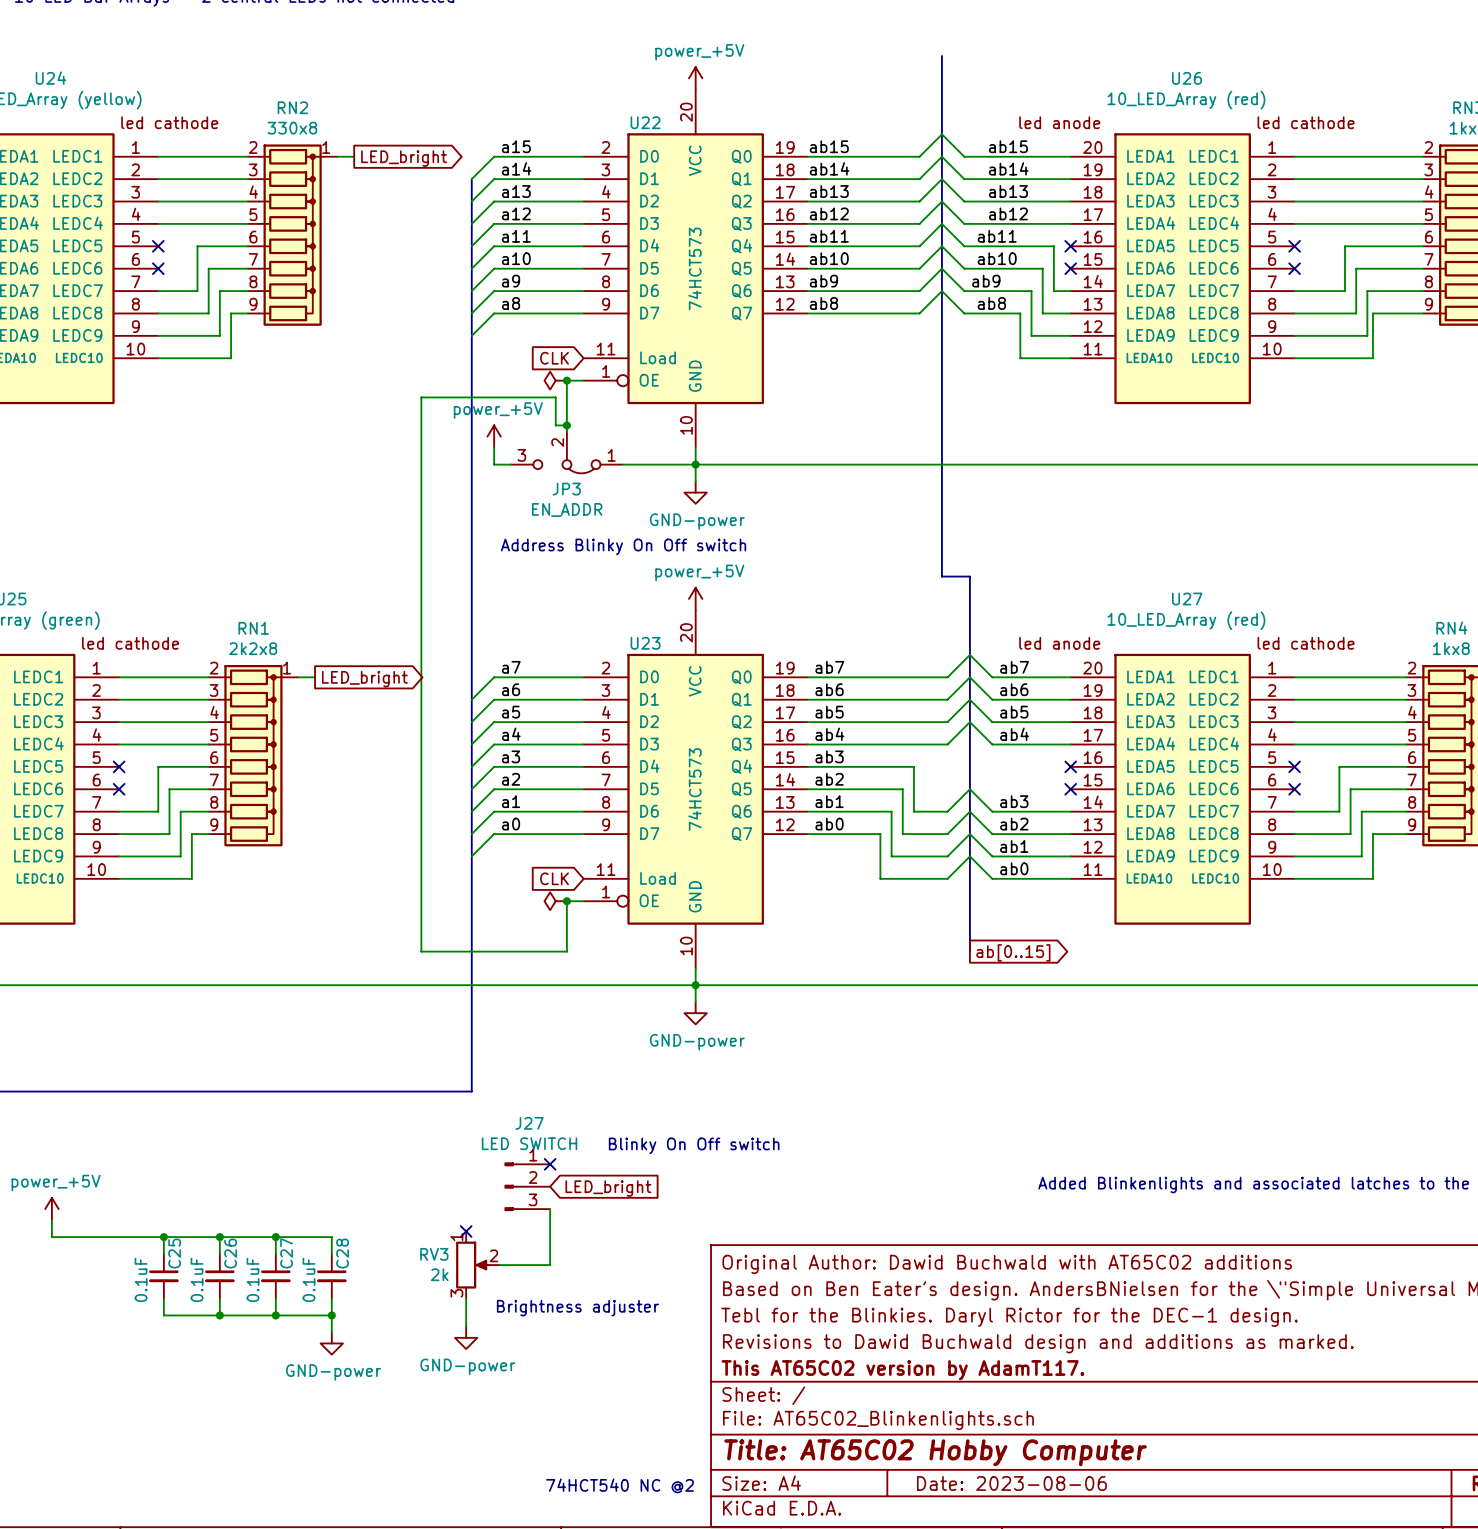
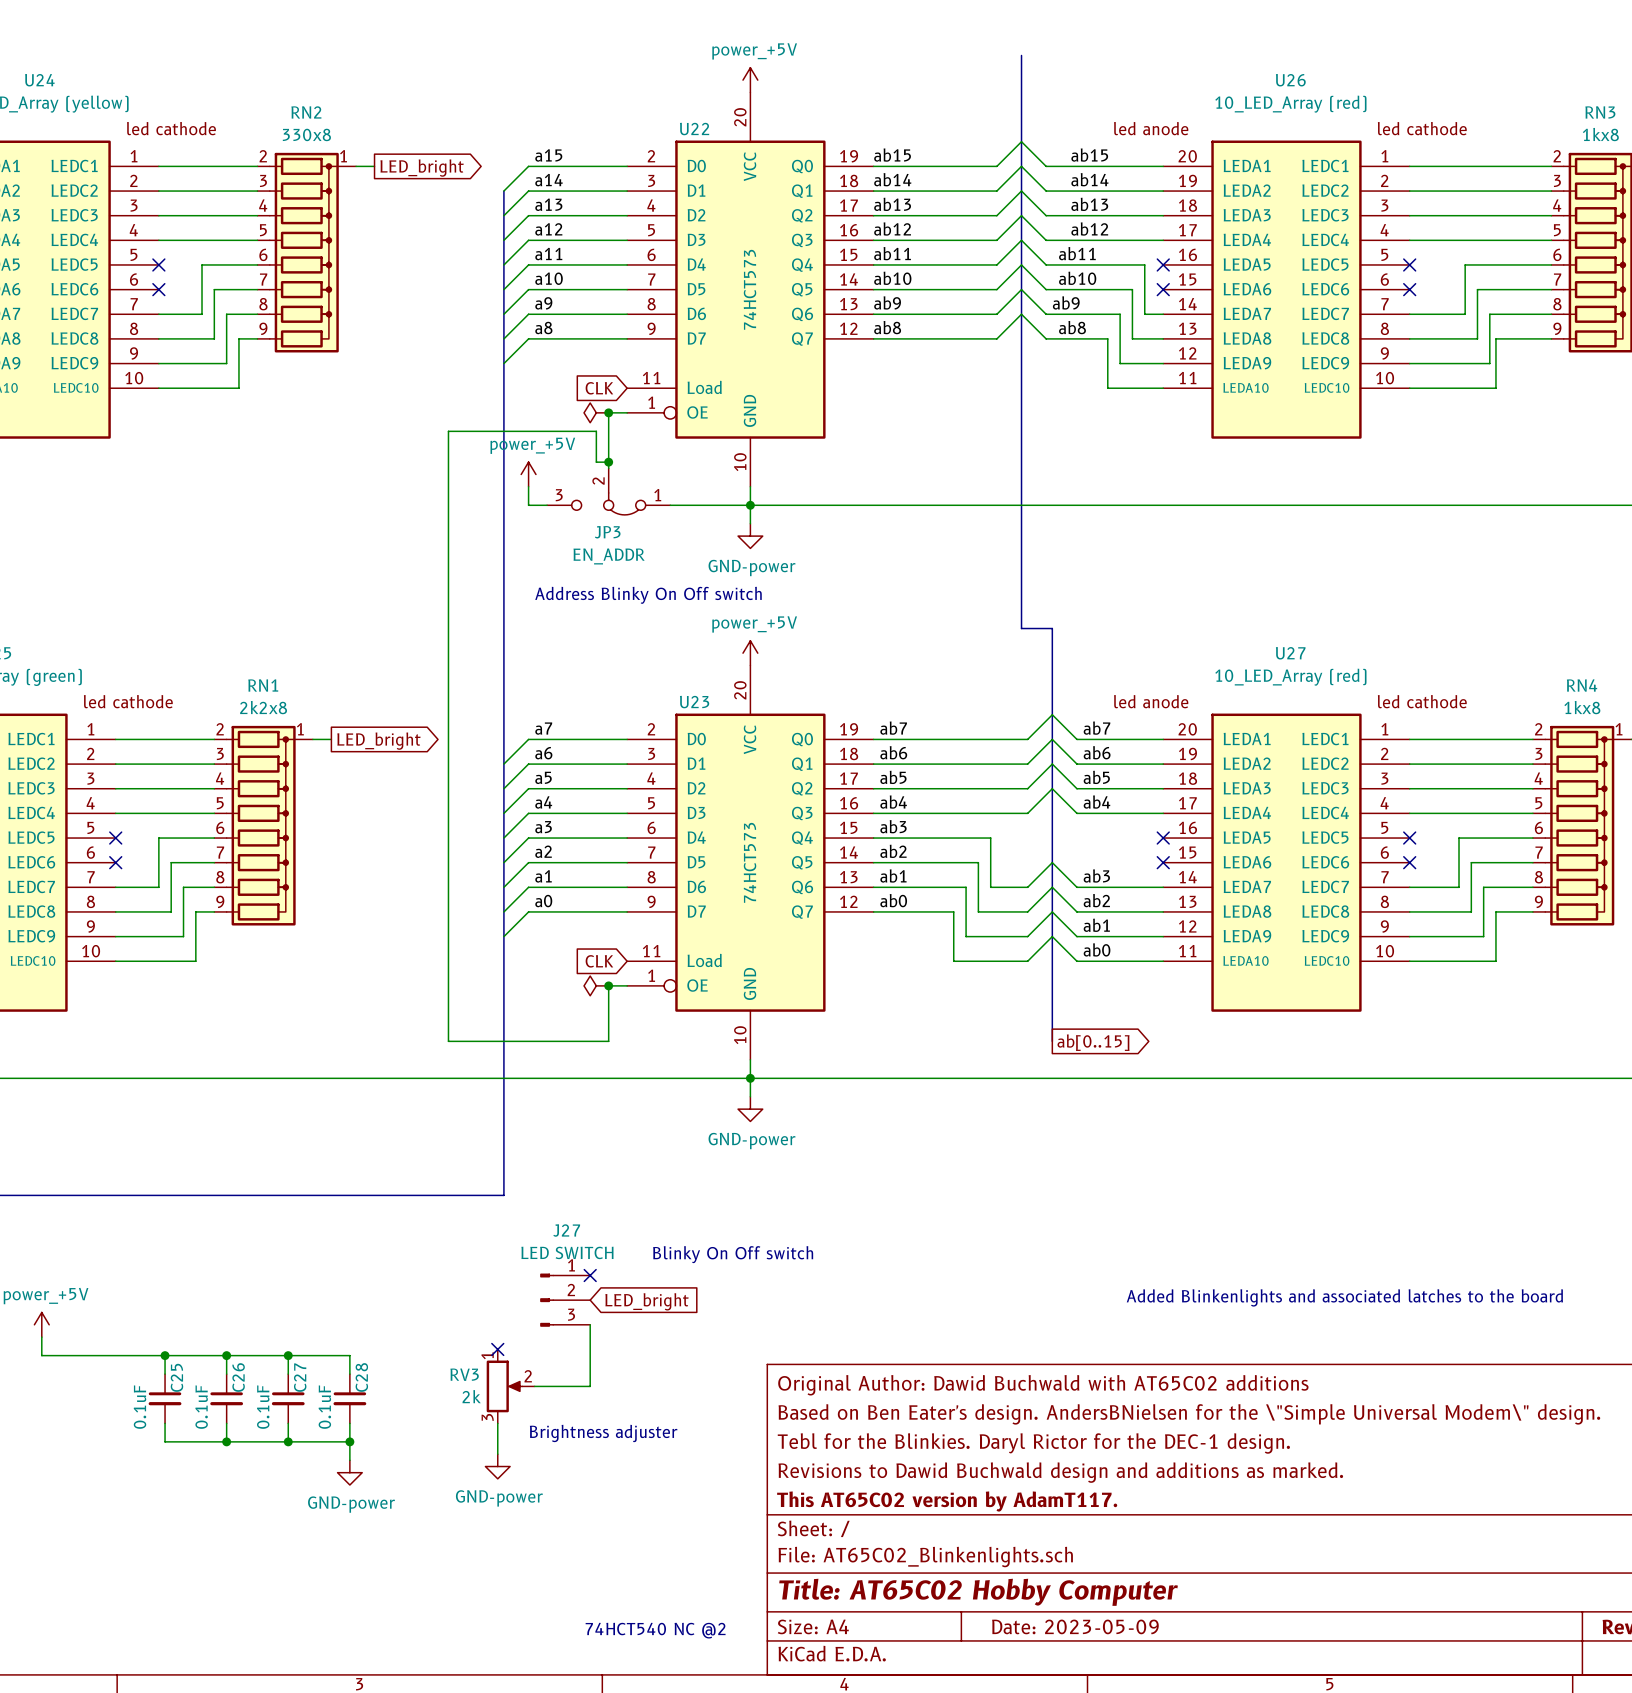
title block: Date: 2023-08-06 (1011, 1483) -> Date: 2023-05-09 (1075, 1626)

